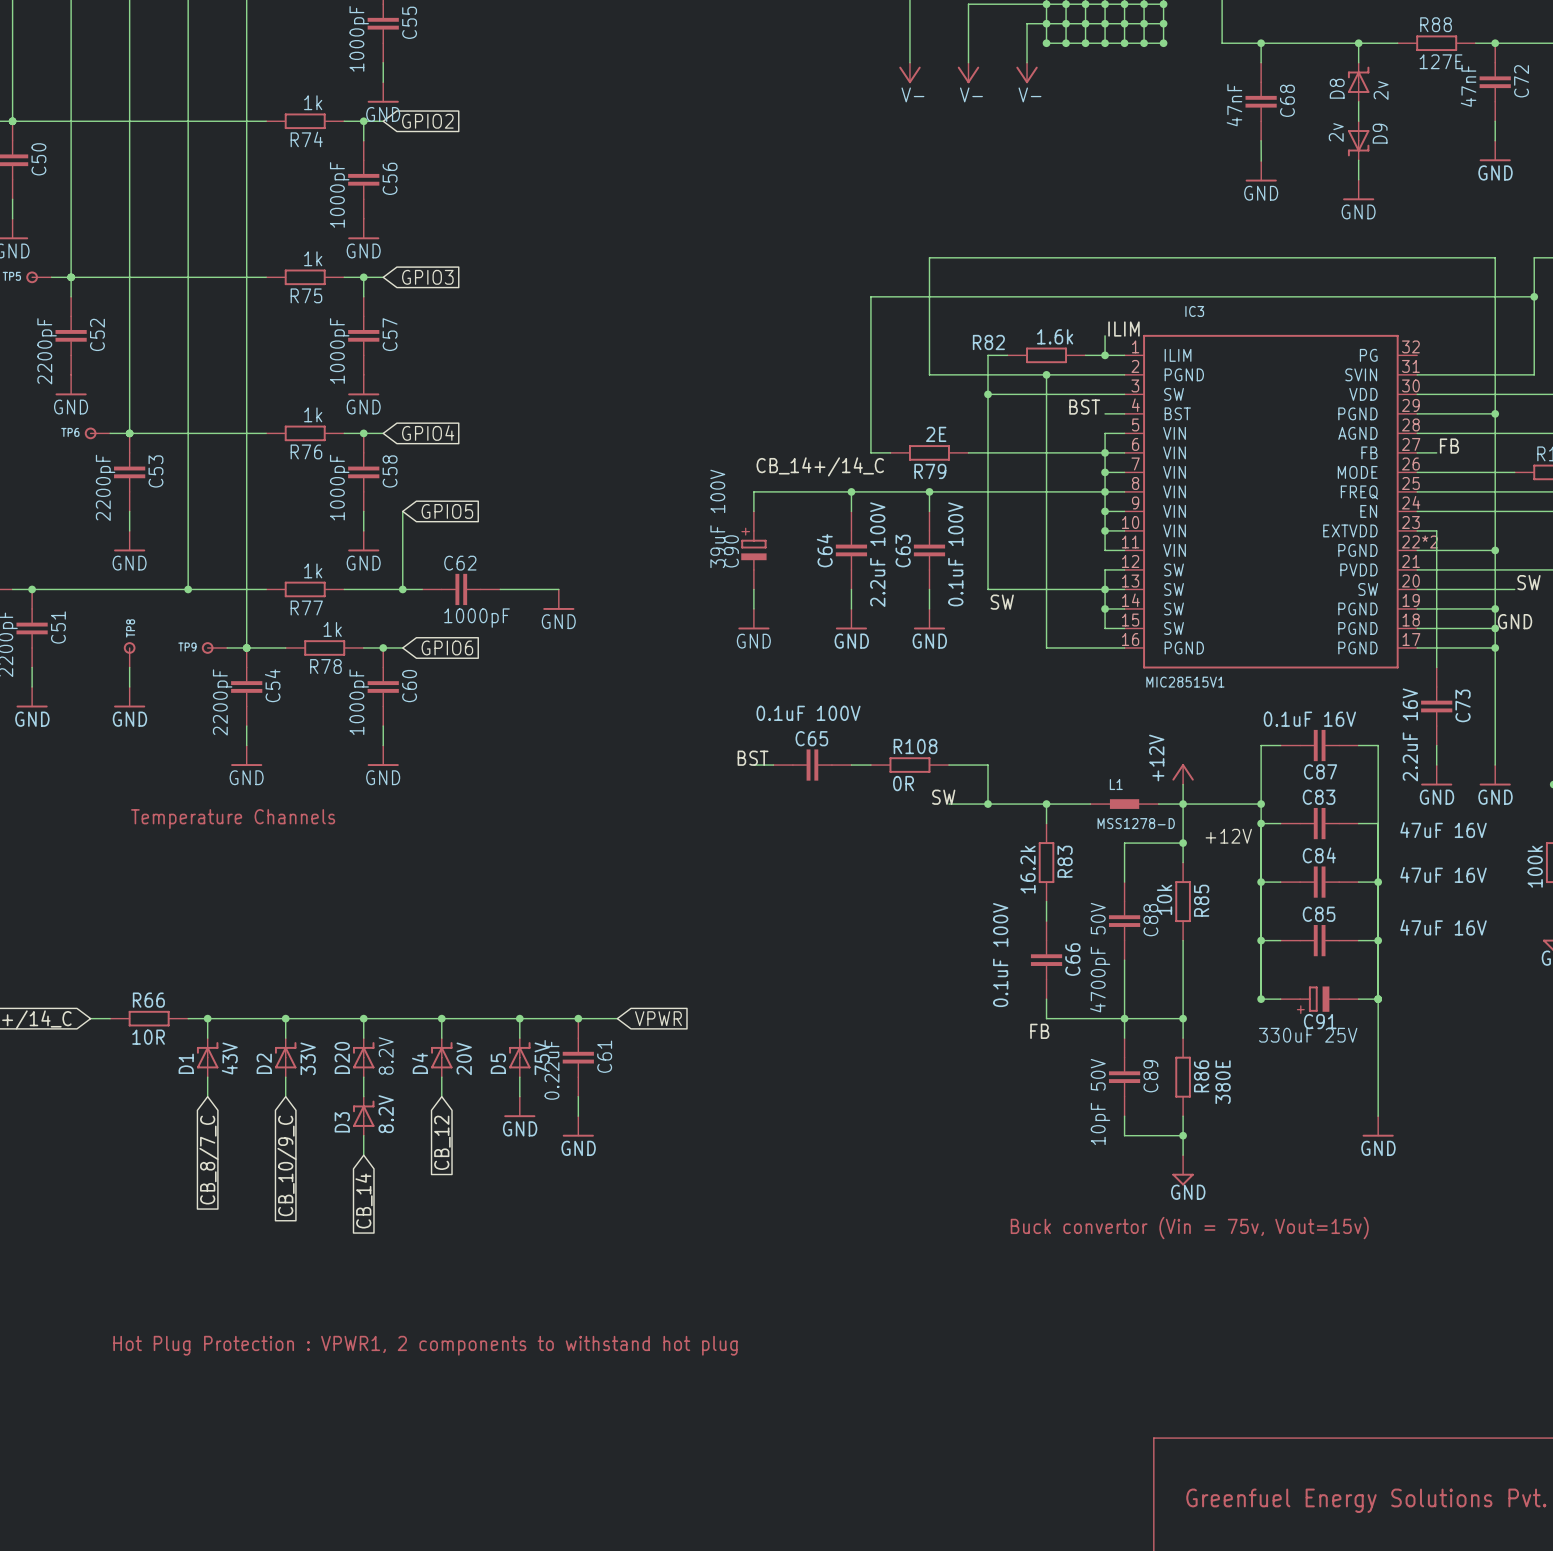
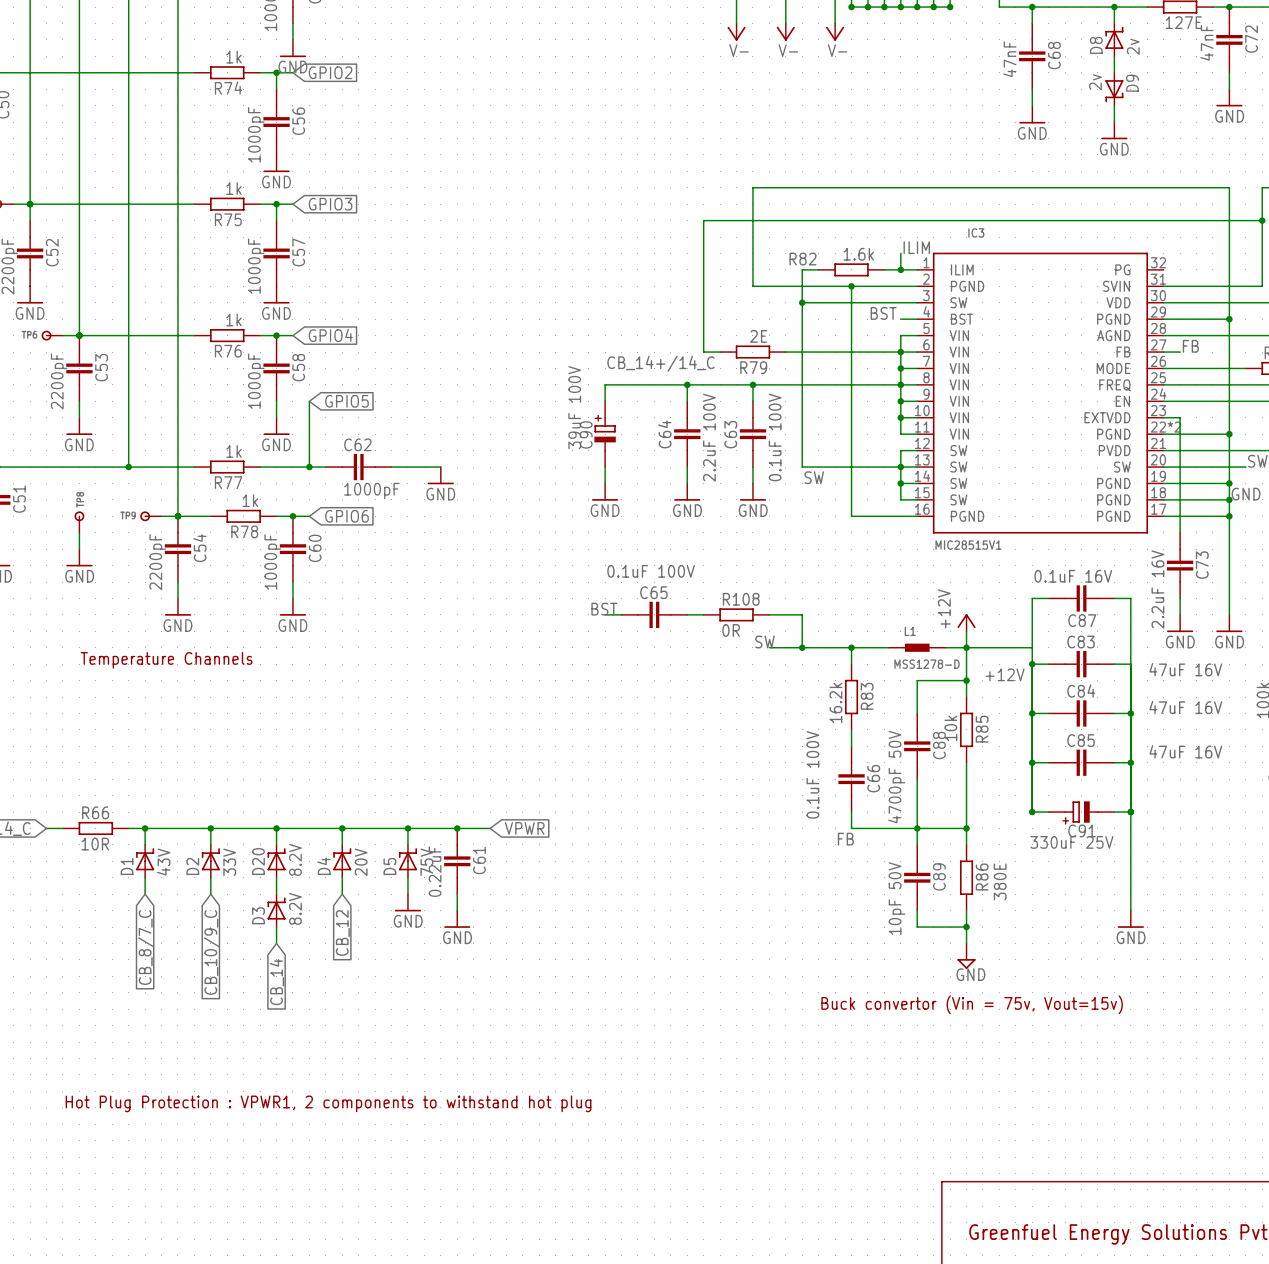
junction: (1261, 804) -> none

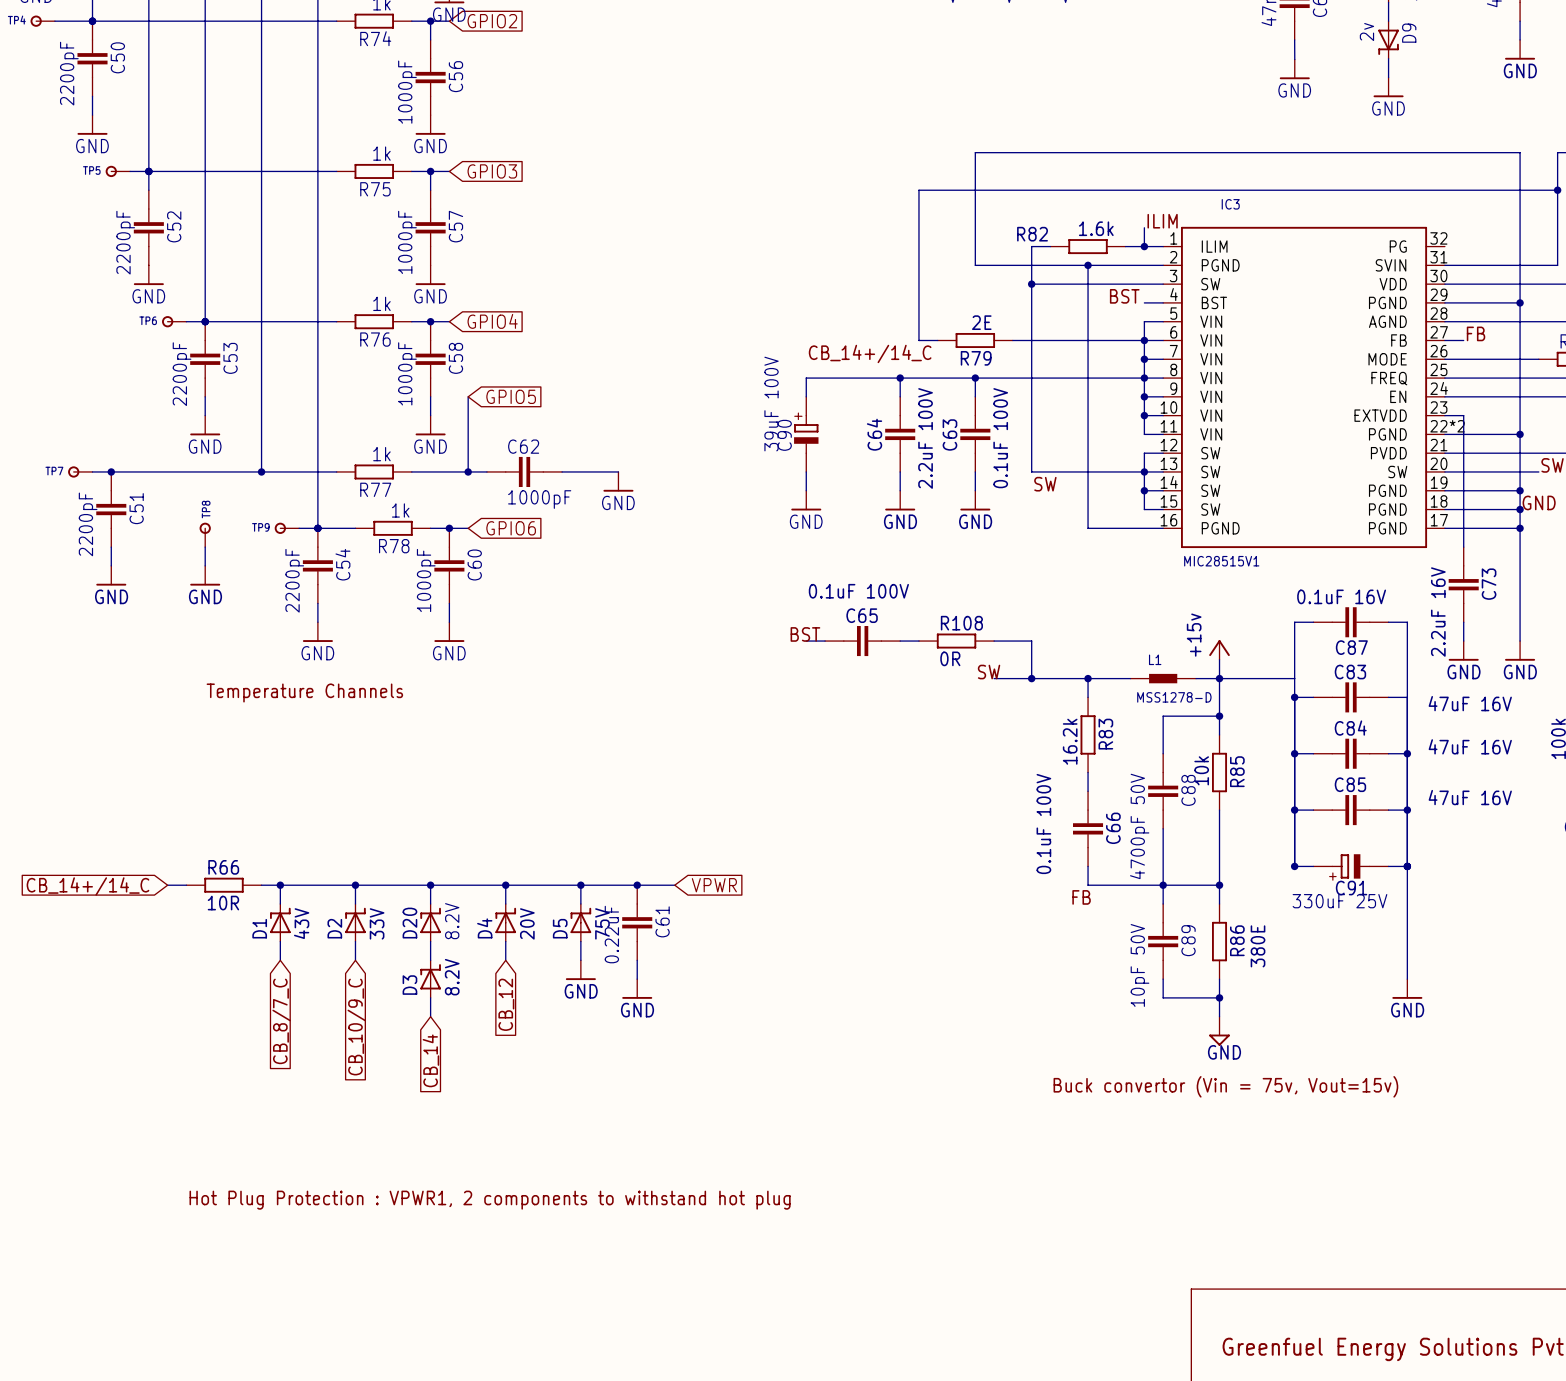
power symbol: +12V (966, 622) -> +15v (1219, 649)
label: +12V (1005, 674) -> none

